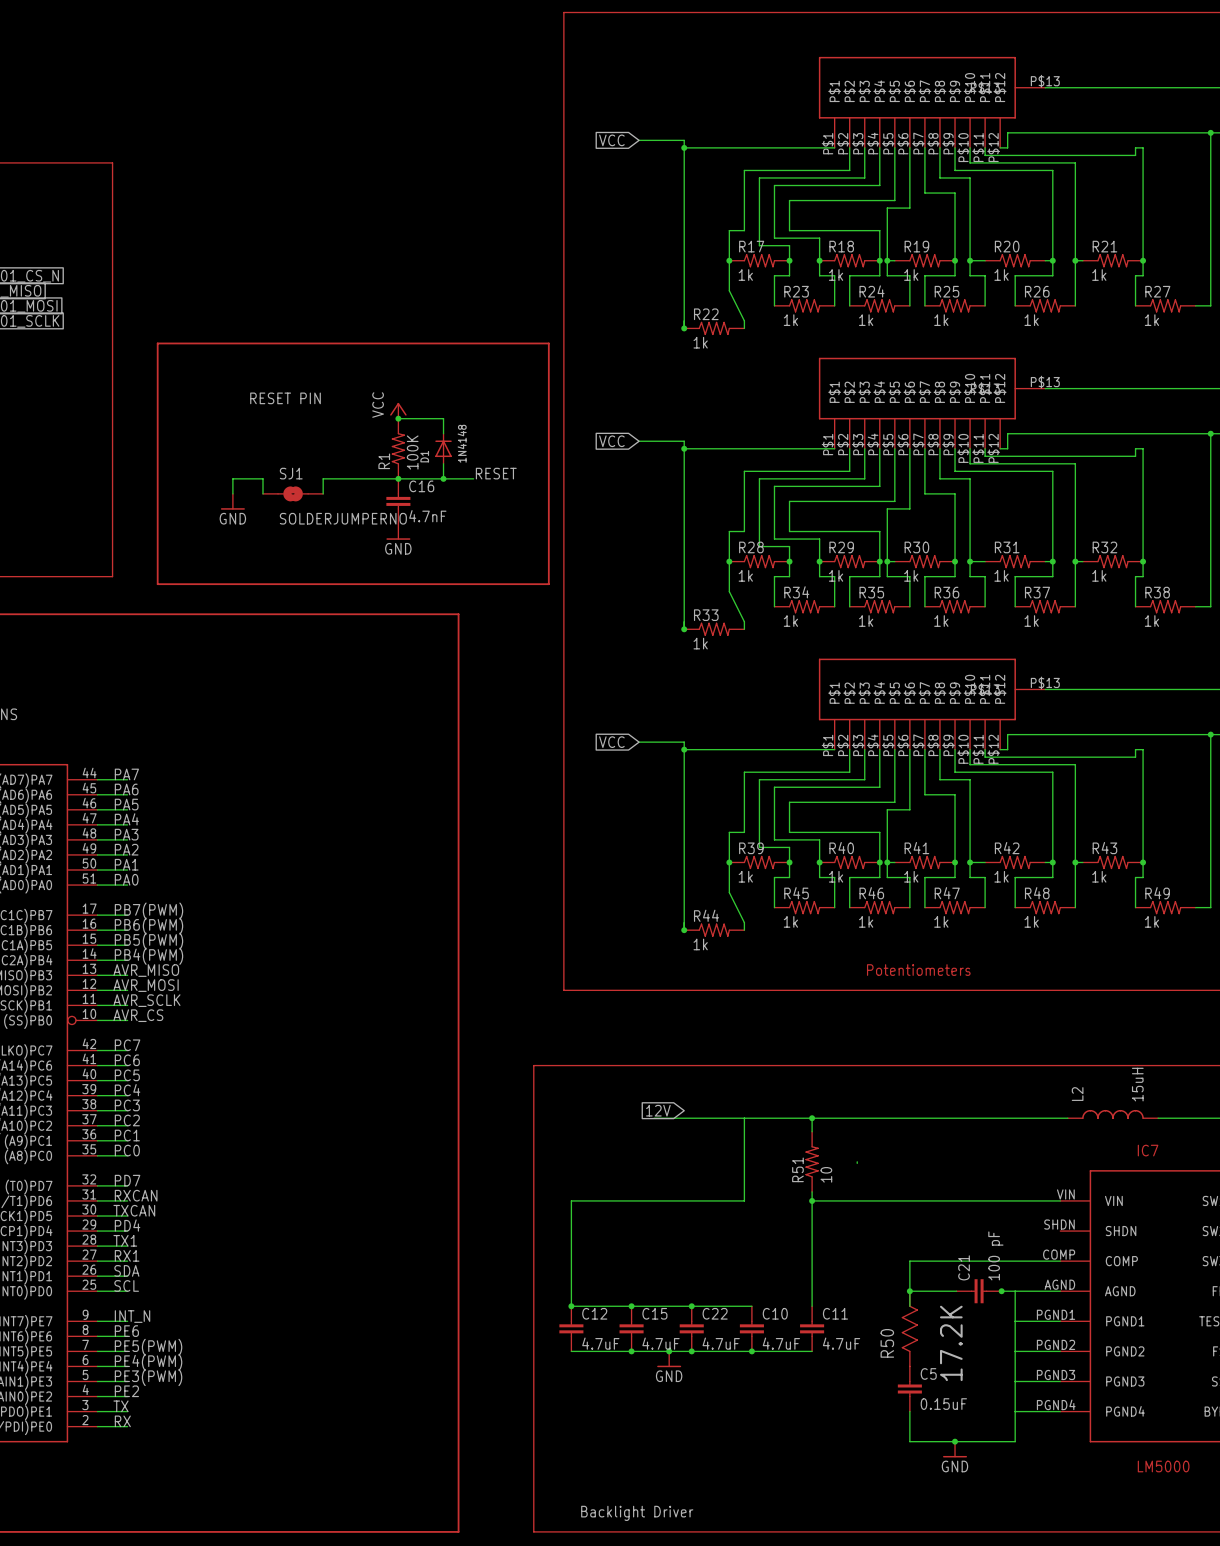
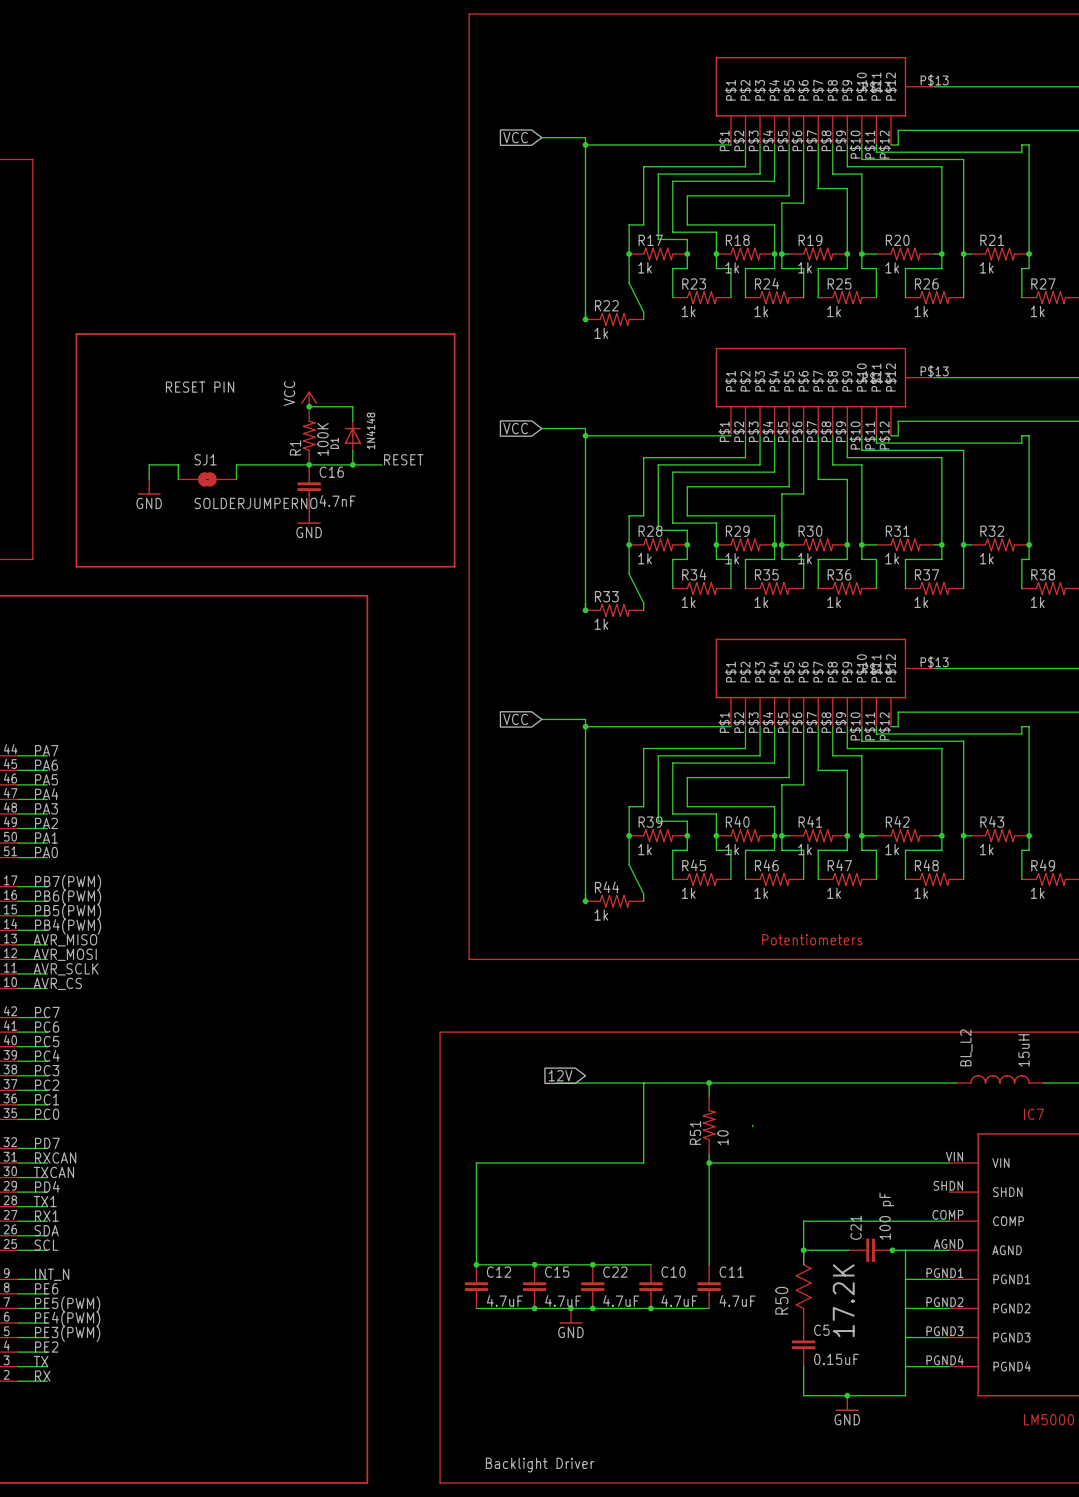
L2 name: L2 (1077, 1094) -> BL_L2 (966, 1047)

